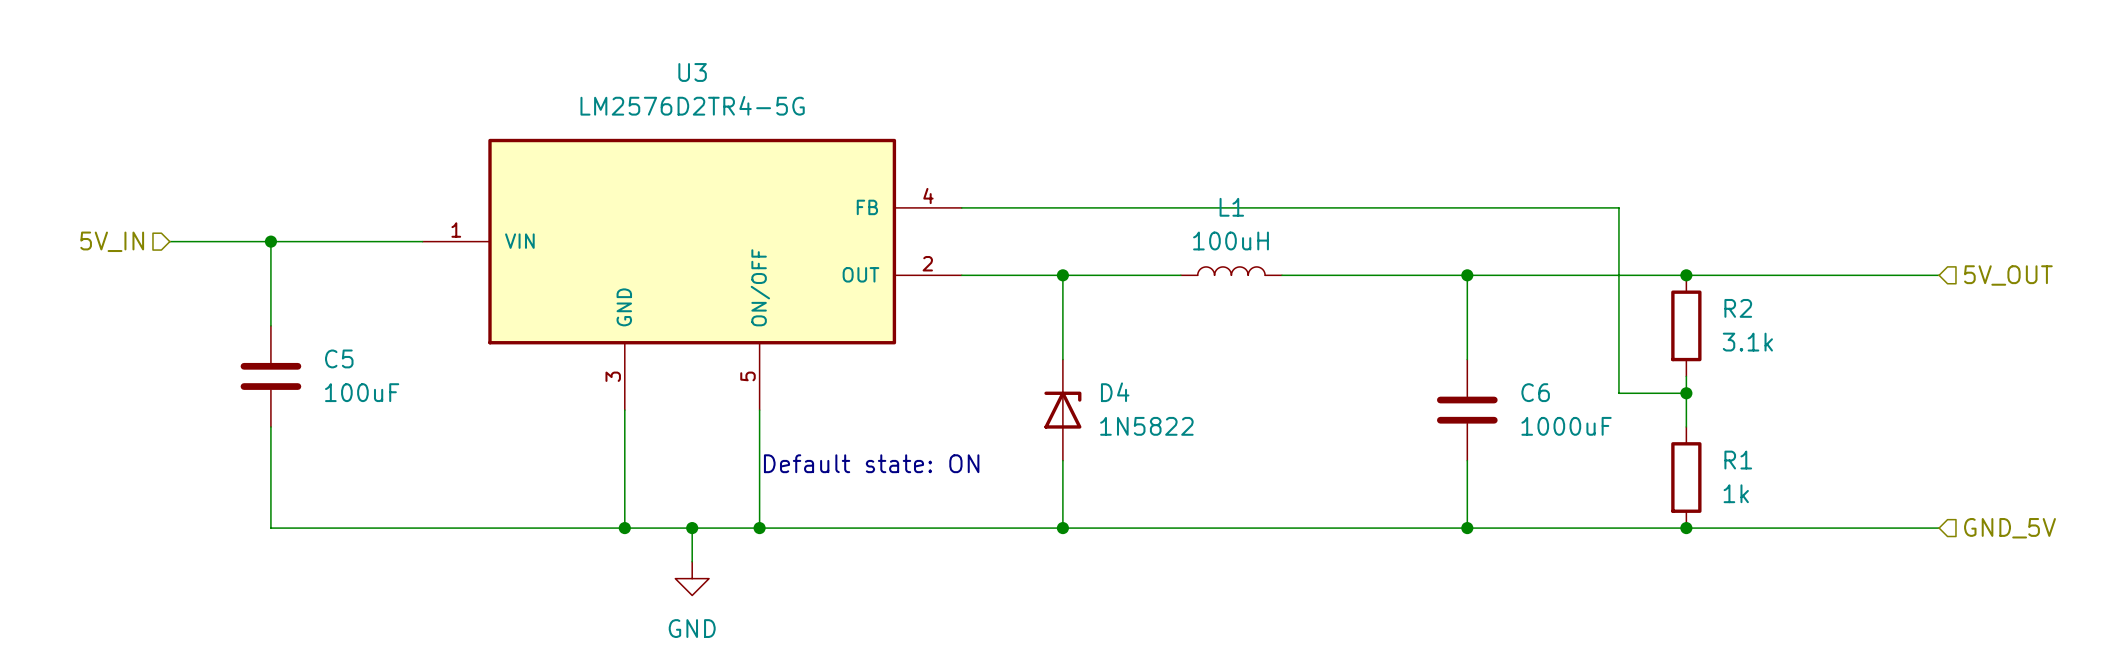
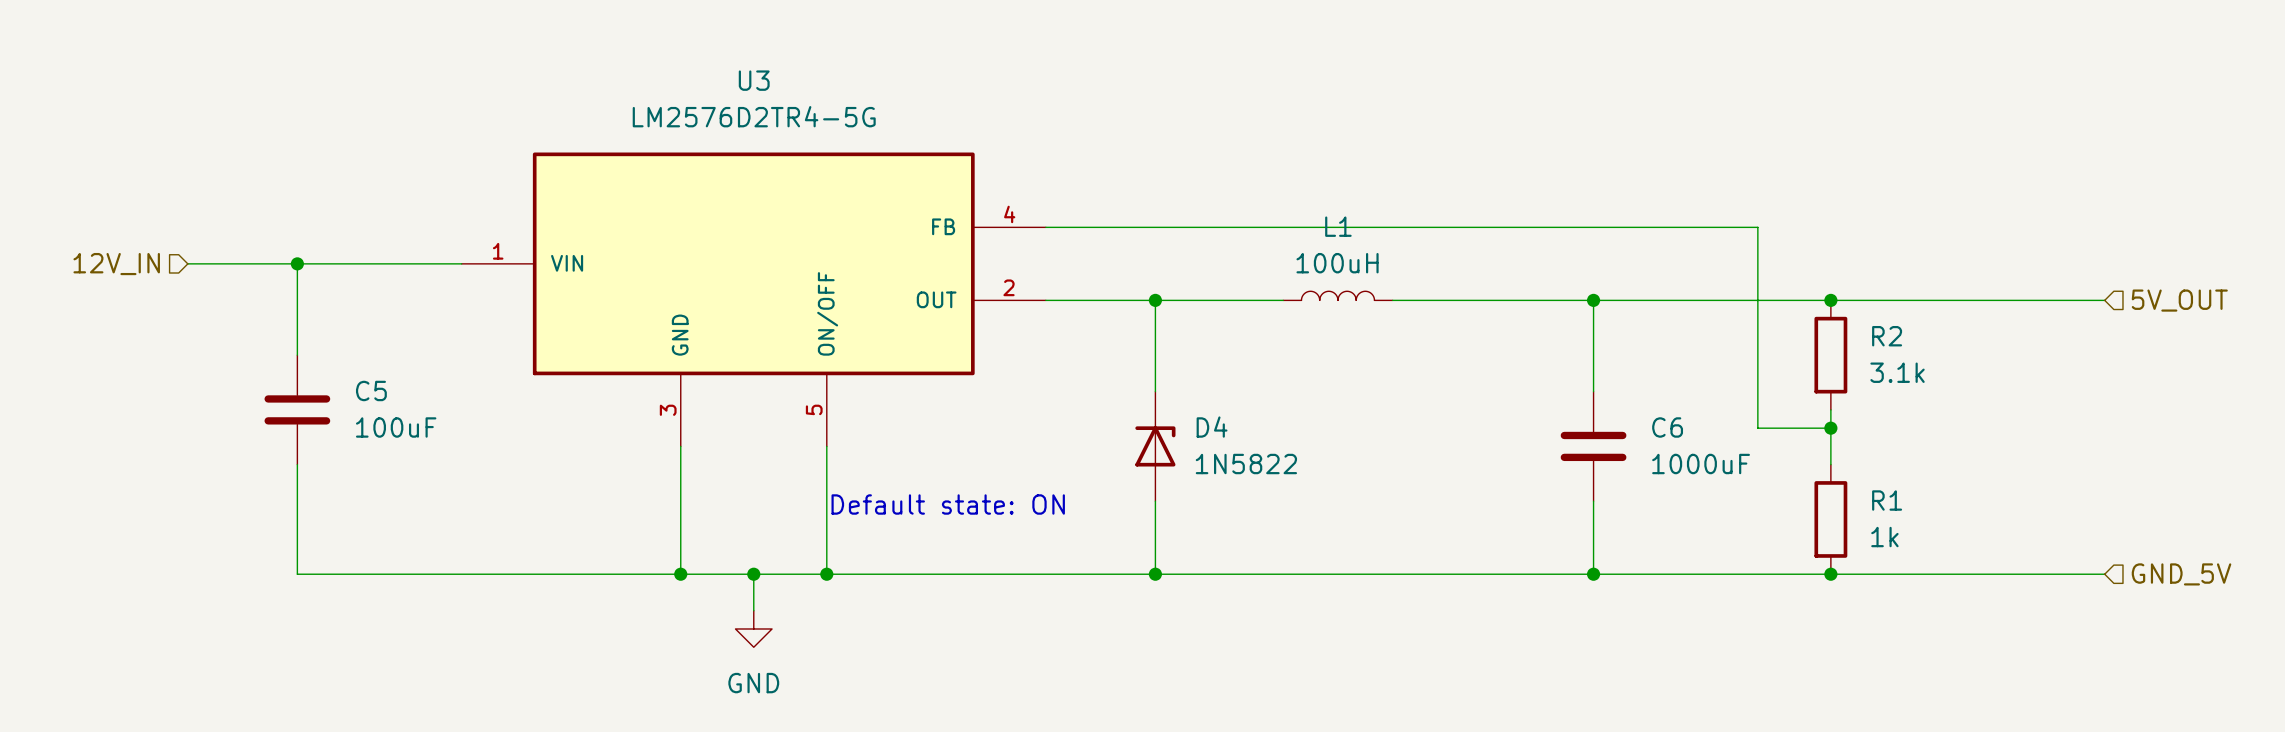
hierarchical label: 5V_IN (112, 241) -> 12V_IN (116, 264)

